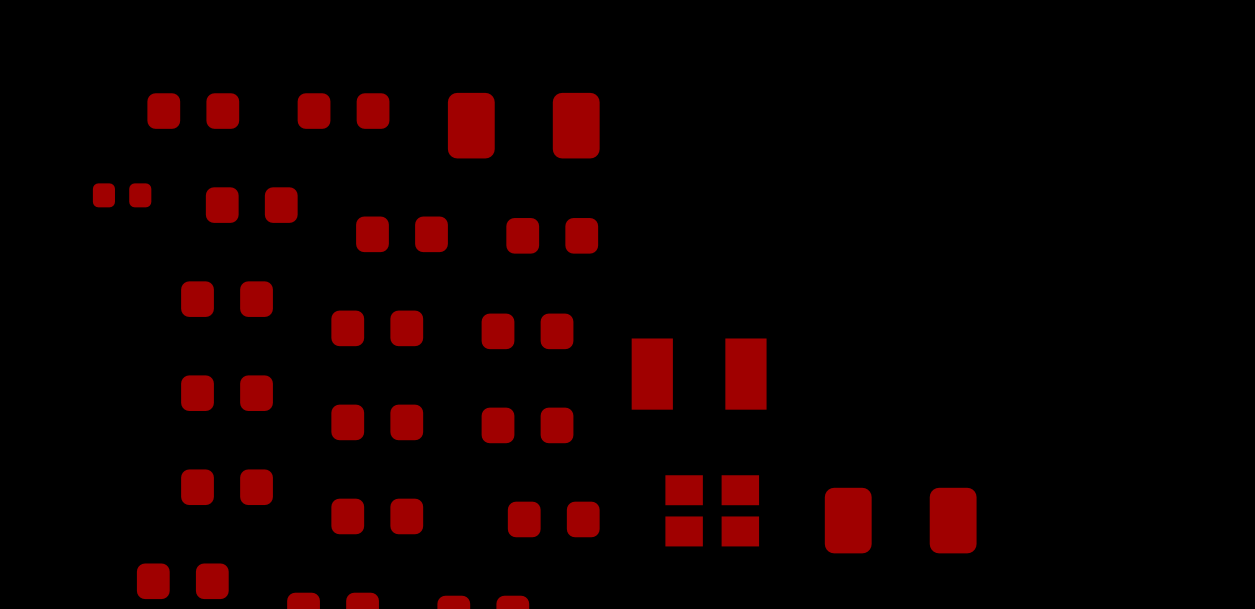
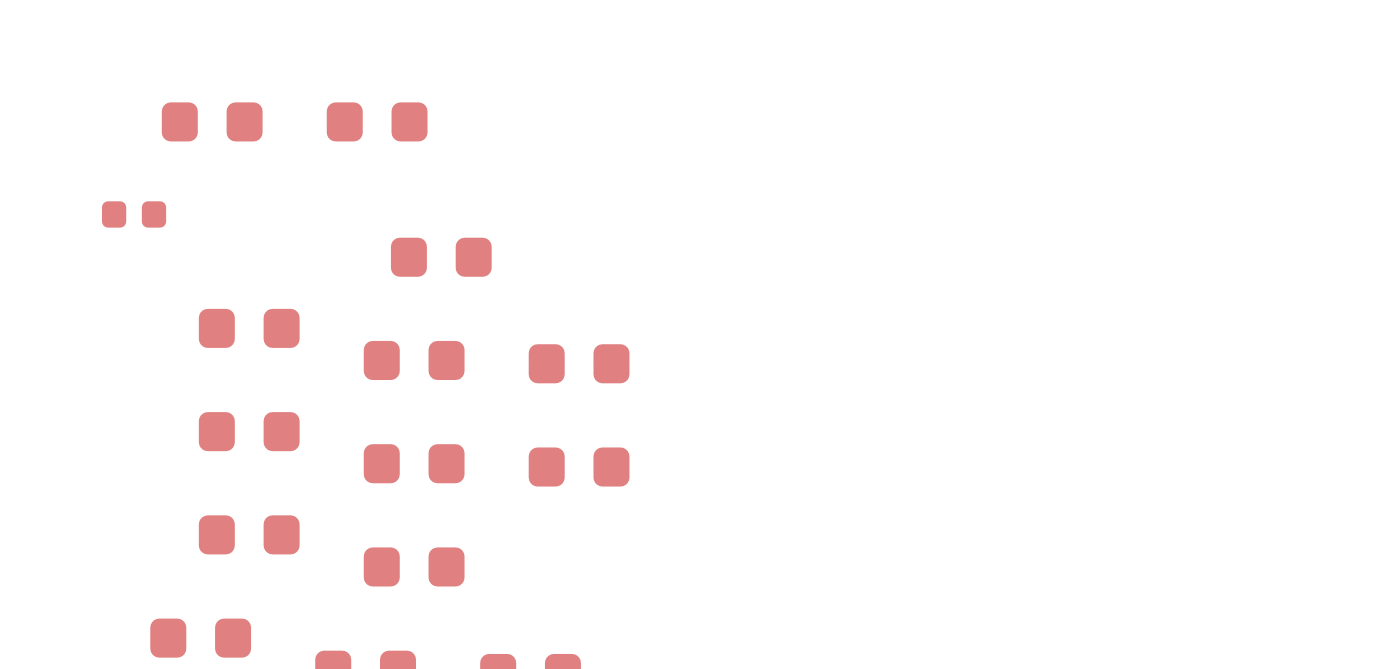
part: (523, 125) -> none
part: (251, 205) -> none
part: (552, 235) -> none
part: (699, 374) -> none
part: (712, 510) -> none
part: (553, 519) -> none
part: (900, 520) -> none

